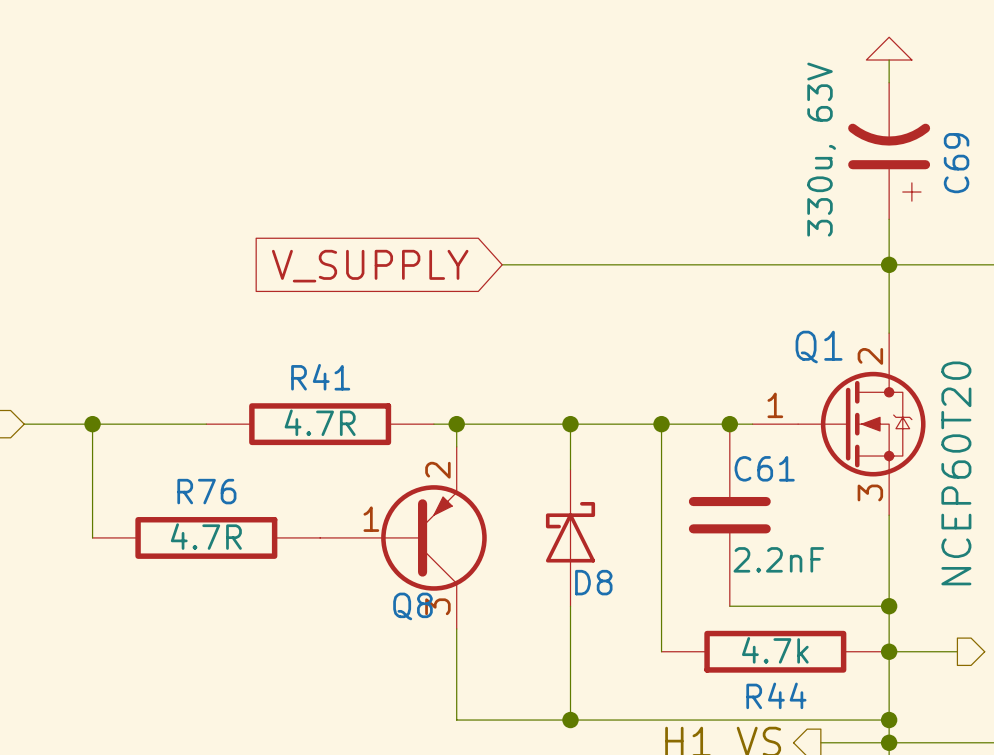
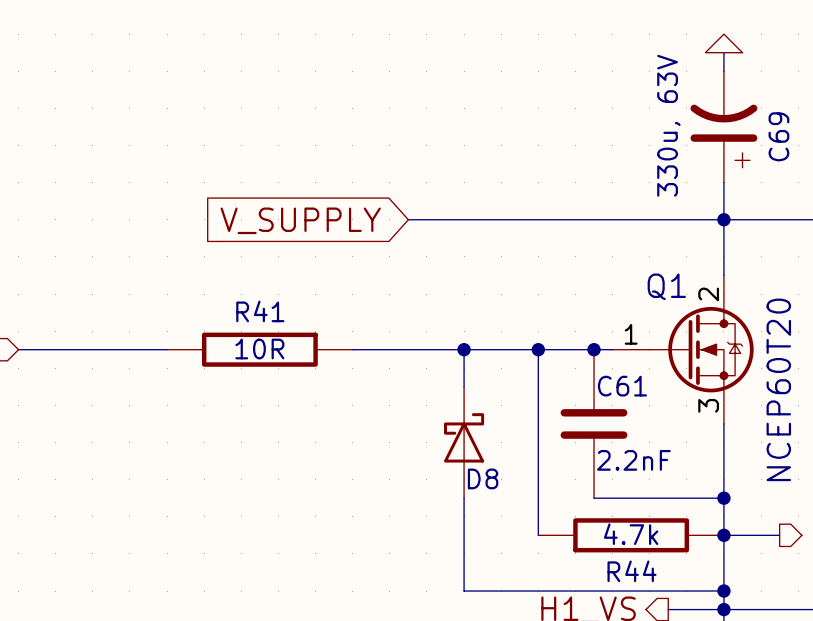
R41 value: 4.7R (320, 422) -> 10R (259, 349)
wire: (92, 424) (92, 537) -> none
junction: (92, 424) -> none
wire: (456, 424) (456, 446) -> none
junction: (456, 424) -> none
R76: 4.7R (206, 537) -> none
Q8: (403, 537) -> none
wire: (456, 628) (456, 720) (570, 720) -> none
junction: (570, 720) -> none

